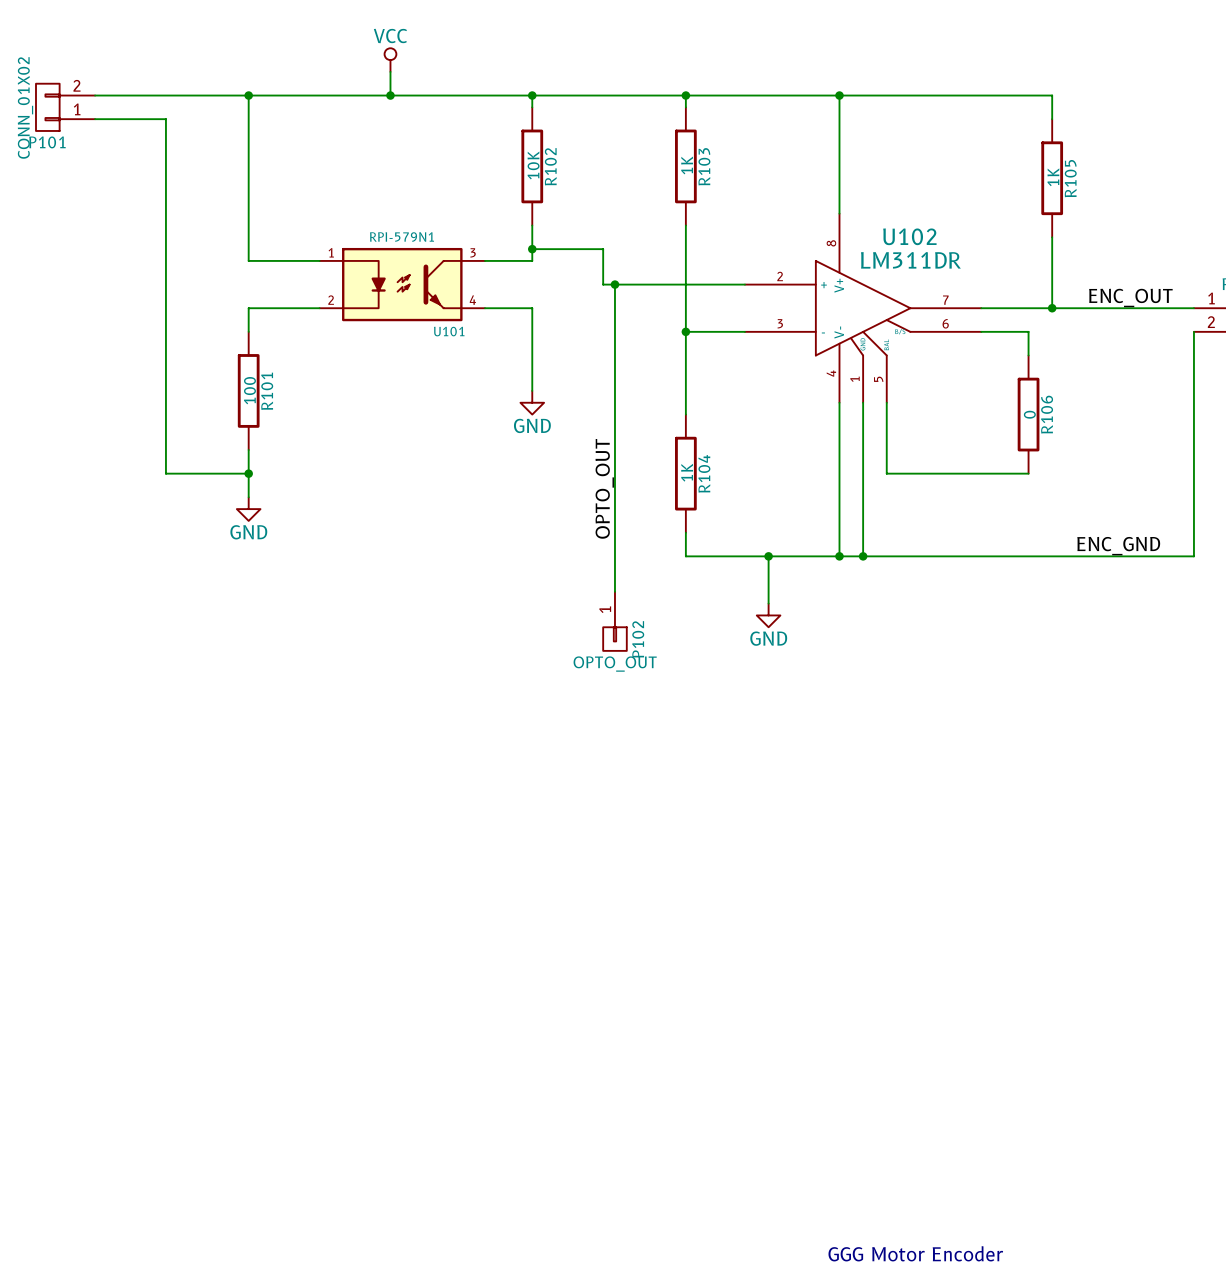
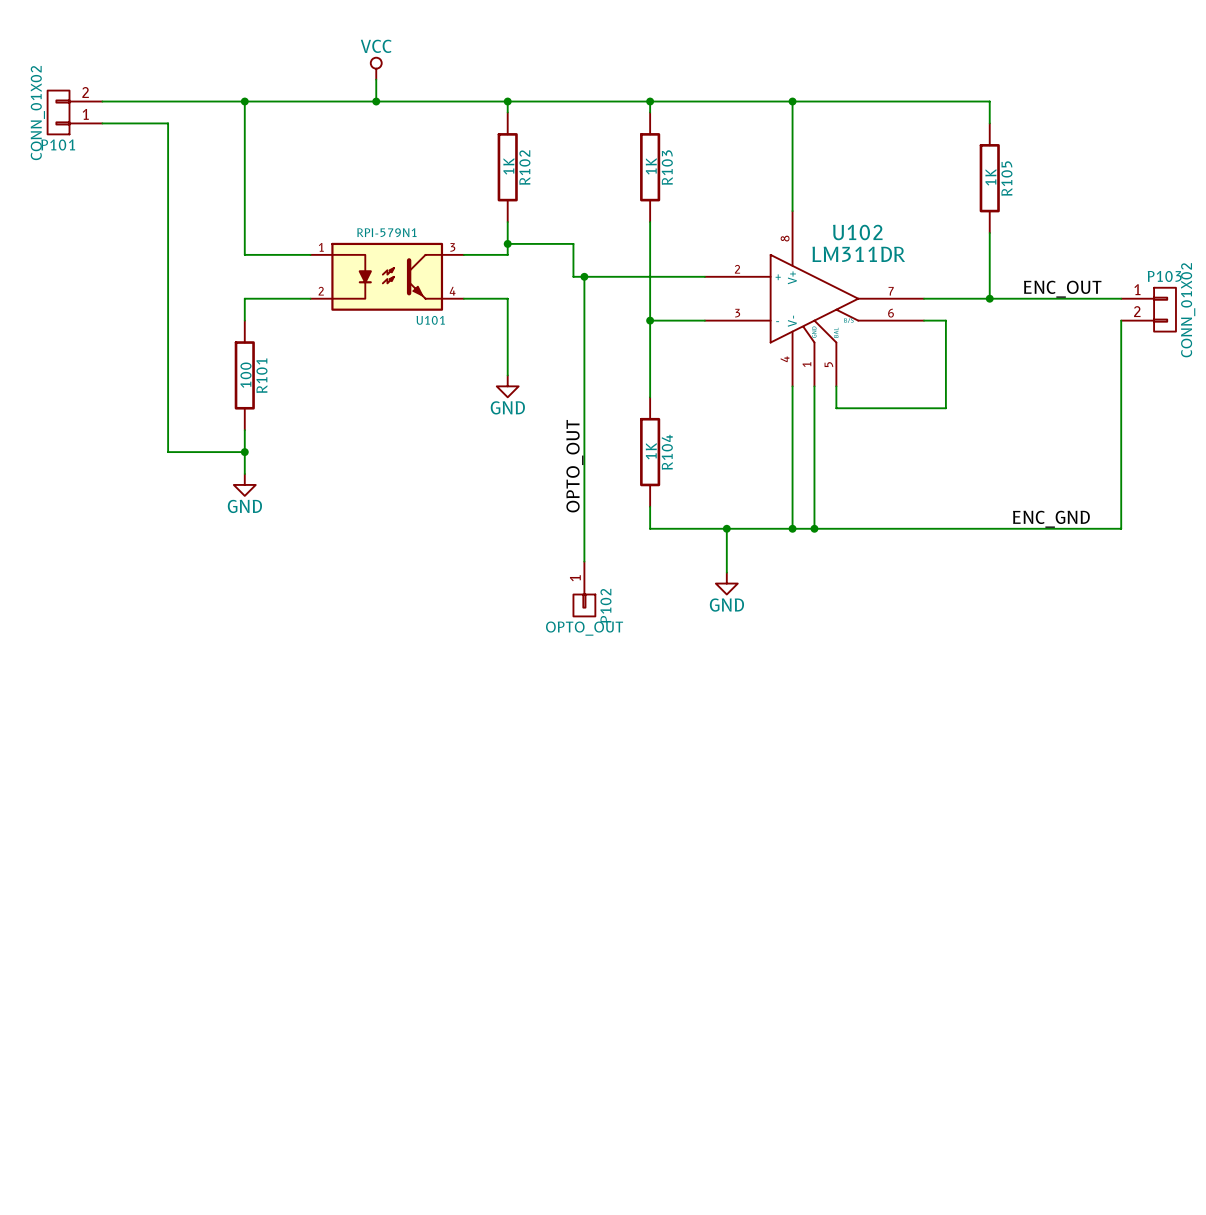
R102 value: 10K (533, 165) -> 1K (508, 166)
wire: (1004, 331) (1028, 331) (1028, 355) -> none
R106: 0 (1028, 414) -> none
wire: (886, 426) (886, 473) (1028, 473) -> (836, 408) (945, 408) (945, 320)
text: GGG Motor Encoder (915, 1253) -> none

